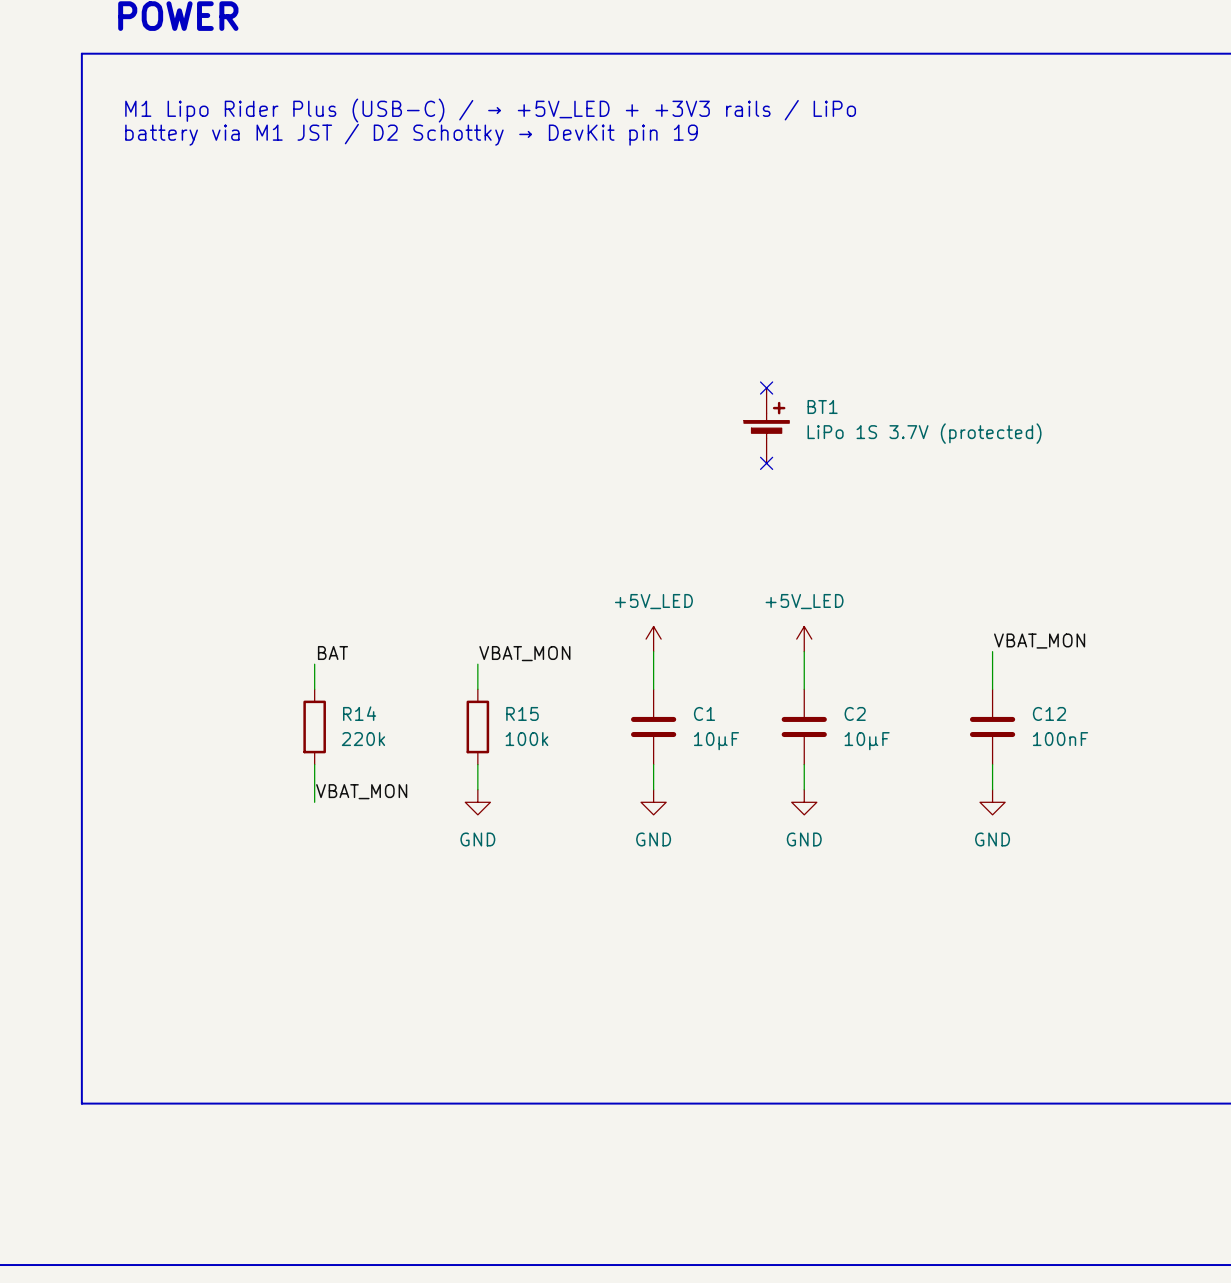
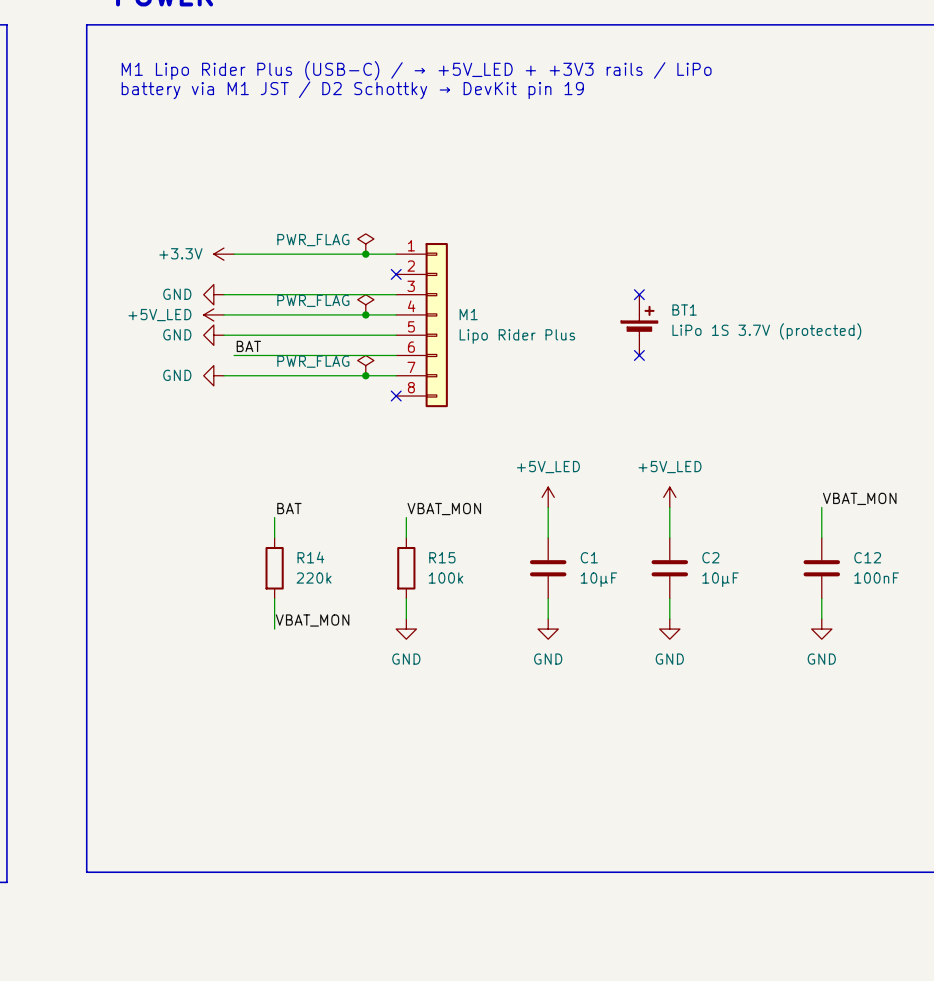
power symbol: none -> PWR_FLAG (365, 244)
power symbol: none -> +3.3V (223, 254)
wire: none -> (234, 254) (396, 254)
junction: none -> (365, 254)
no-connect mark: none -> (396, 274)
power symbol: none -> GND (213, 294)
wire: none -> (223, 294) (396, 294)
power symbol: none -> PWR_FLAG (365, 304)
power symbol: none -> +5V_LED (213, 314)
wire: none -> (223, 314) (396, 314)
junction: none -> (365, 314)
M1: none -> Lipo Rider Plus (422, 325)
power symbol: none -> GND (213, 335)
wire: none -> (223, 335) (396, 335)
label: none -> BAT (248, 346)
wire: none -> (234, 355) (396, 355)
power symbol: none -> PWR_FLAG (365, 365)
power symbol: none -> GND (213, 375)
wire: none -> (223, 375) (396, 375)
junction: none -> (365, 375)
no-connect mark: none -> (396, 396)

